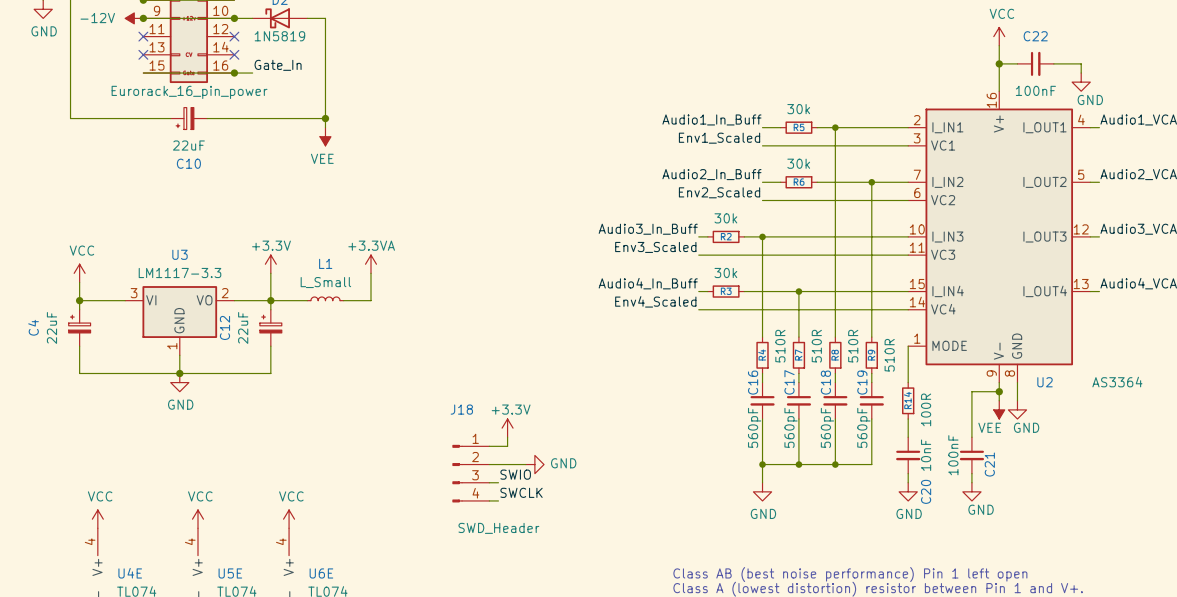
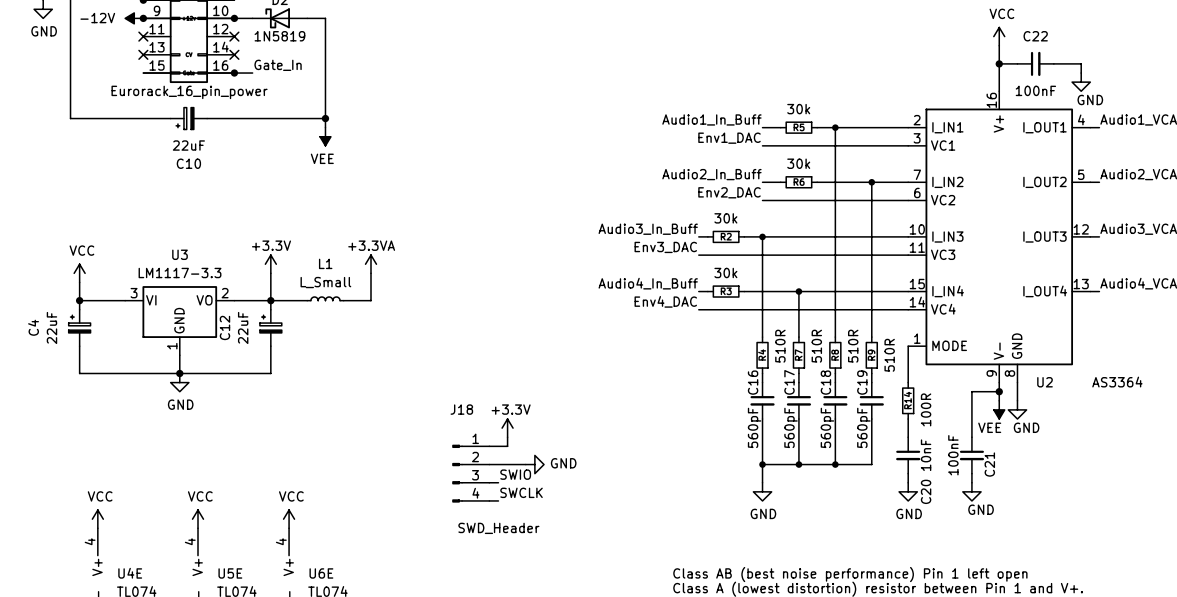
label: Env1_Scaled (719, 138) -> Env1_DAC (729, 138)
label: Env2_Scaled (719, 192) -> Env2_DAC (729, 192)
label: Env3_Scaled (655, 247) -> Env3_DAC (665, 247)
label: Env4_Scaled (655, 301) -> Env4_DAC (665, 301)

